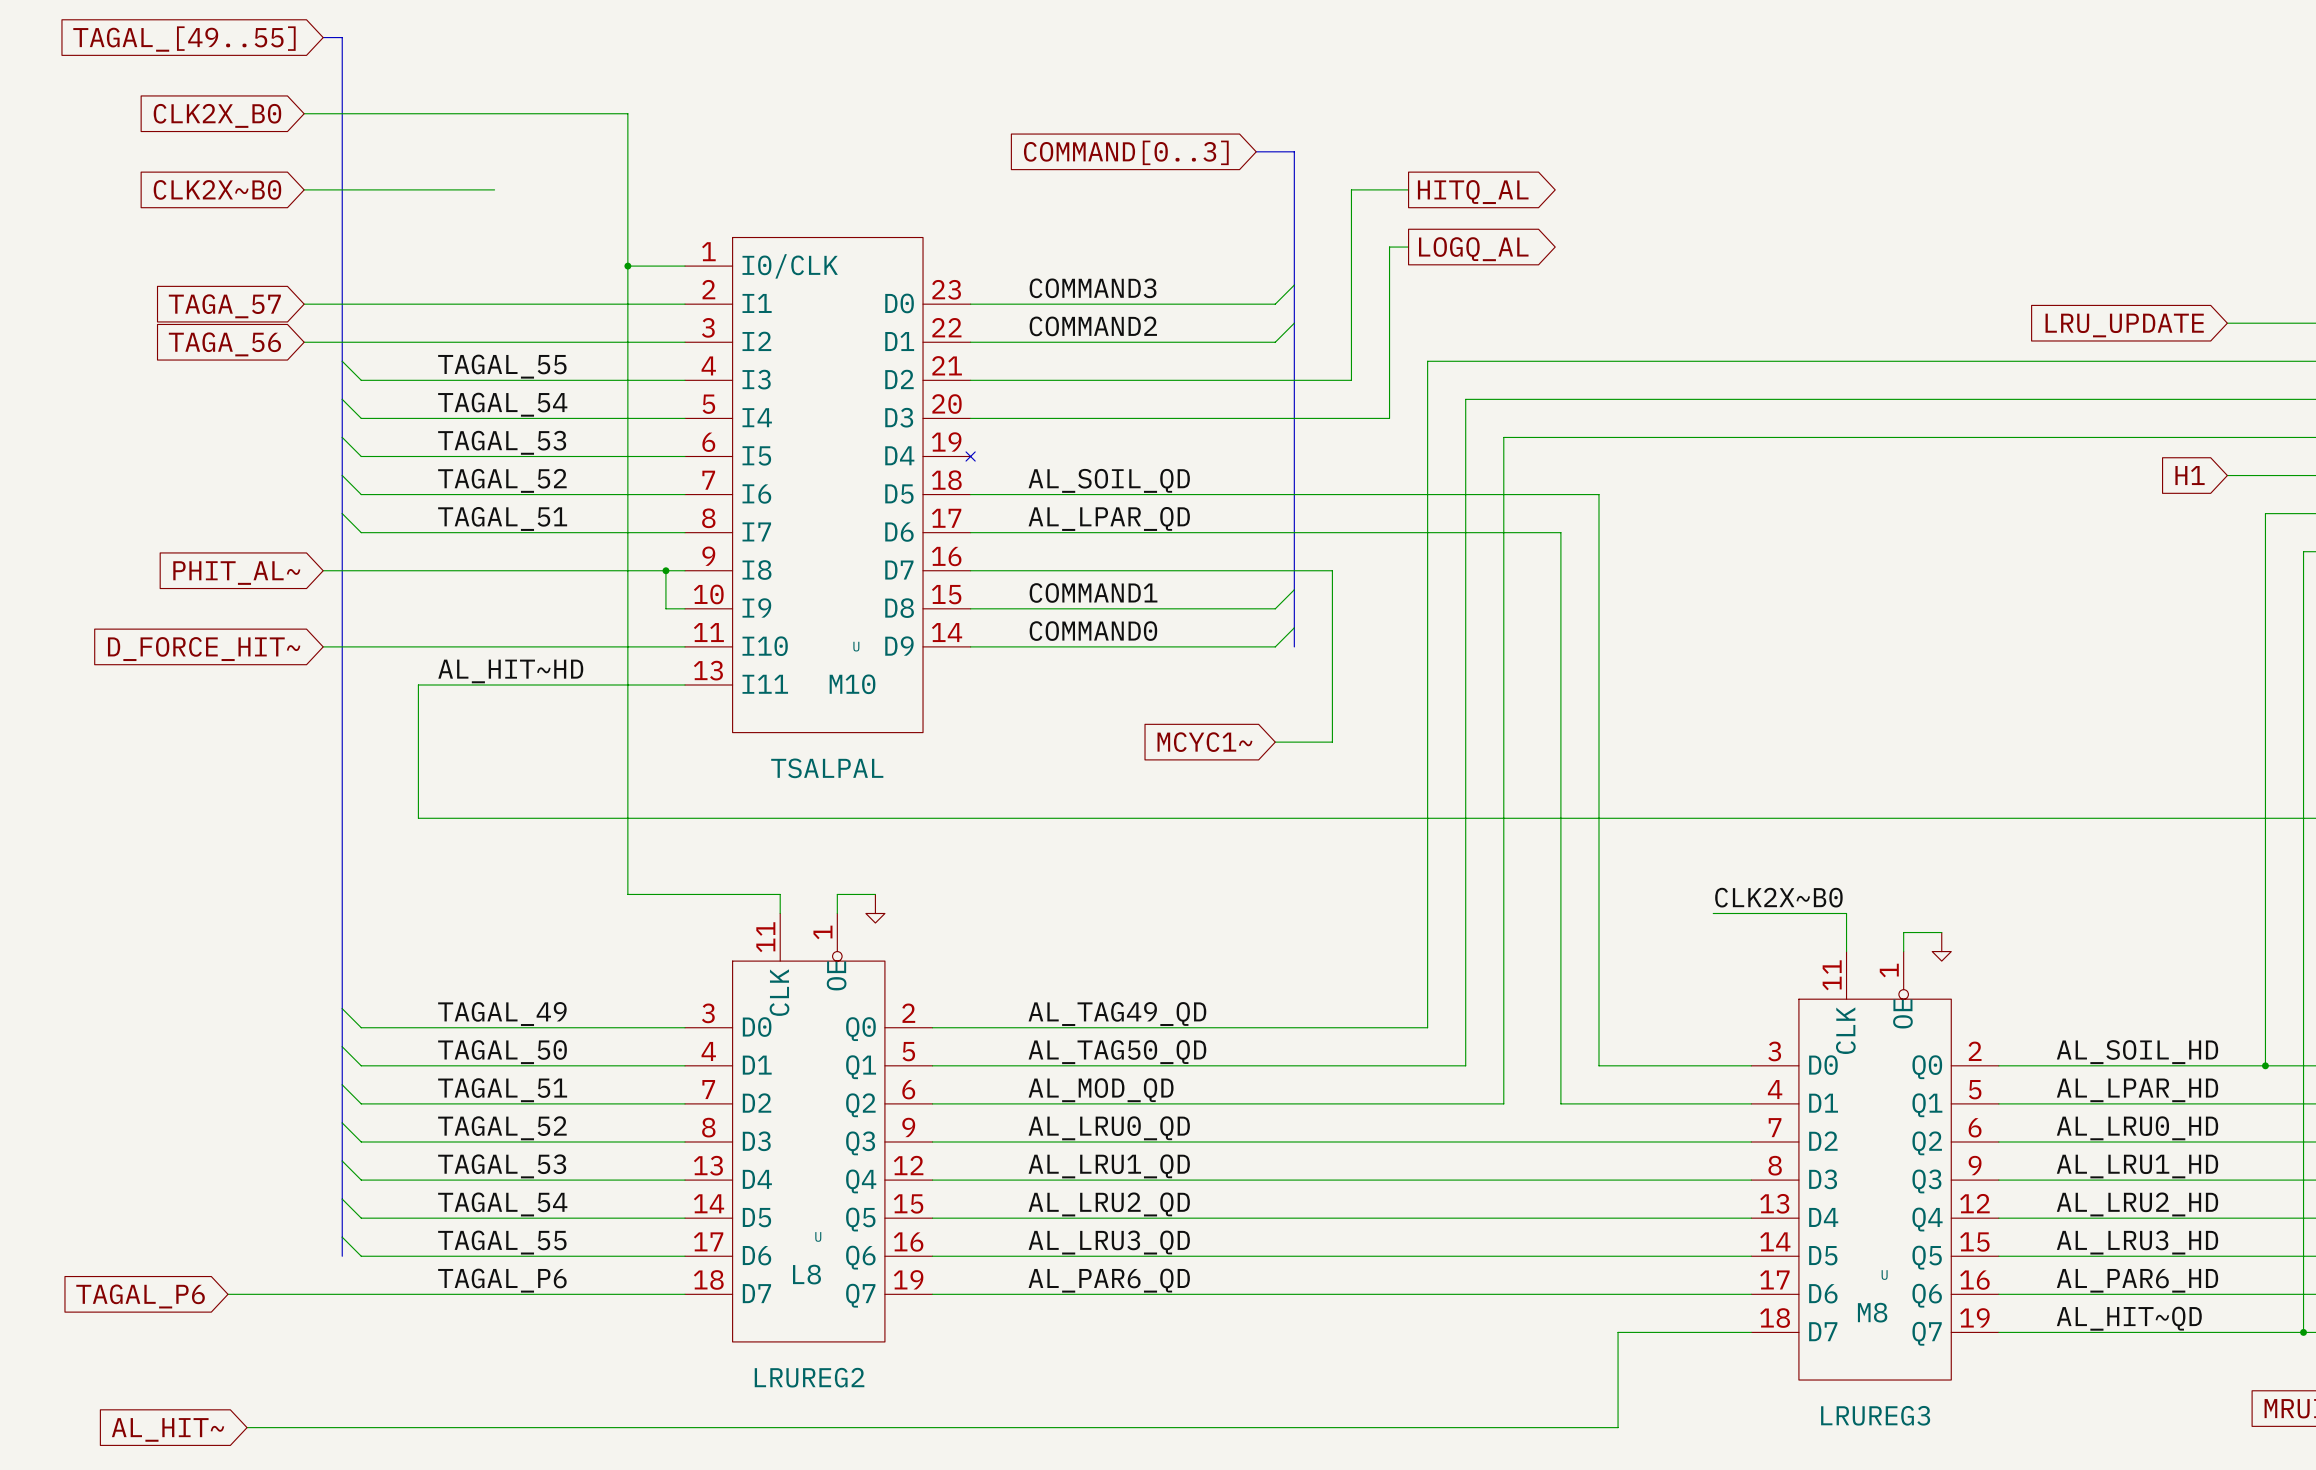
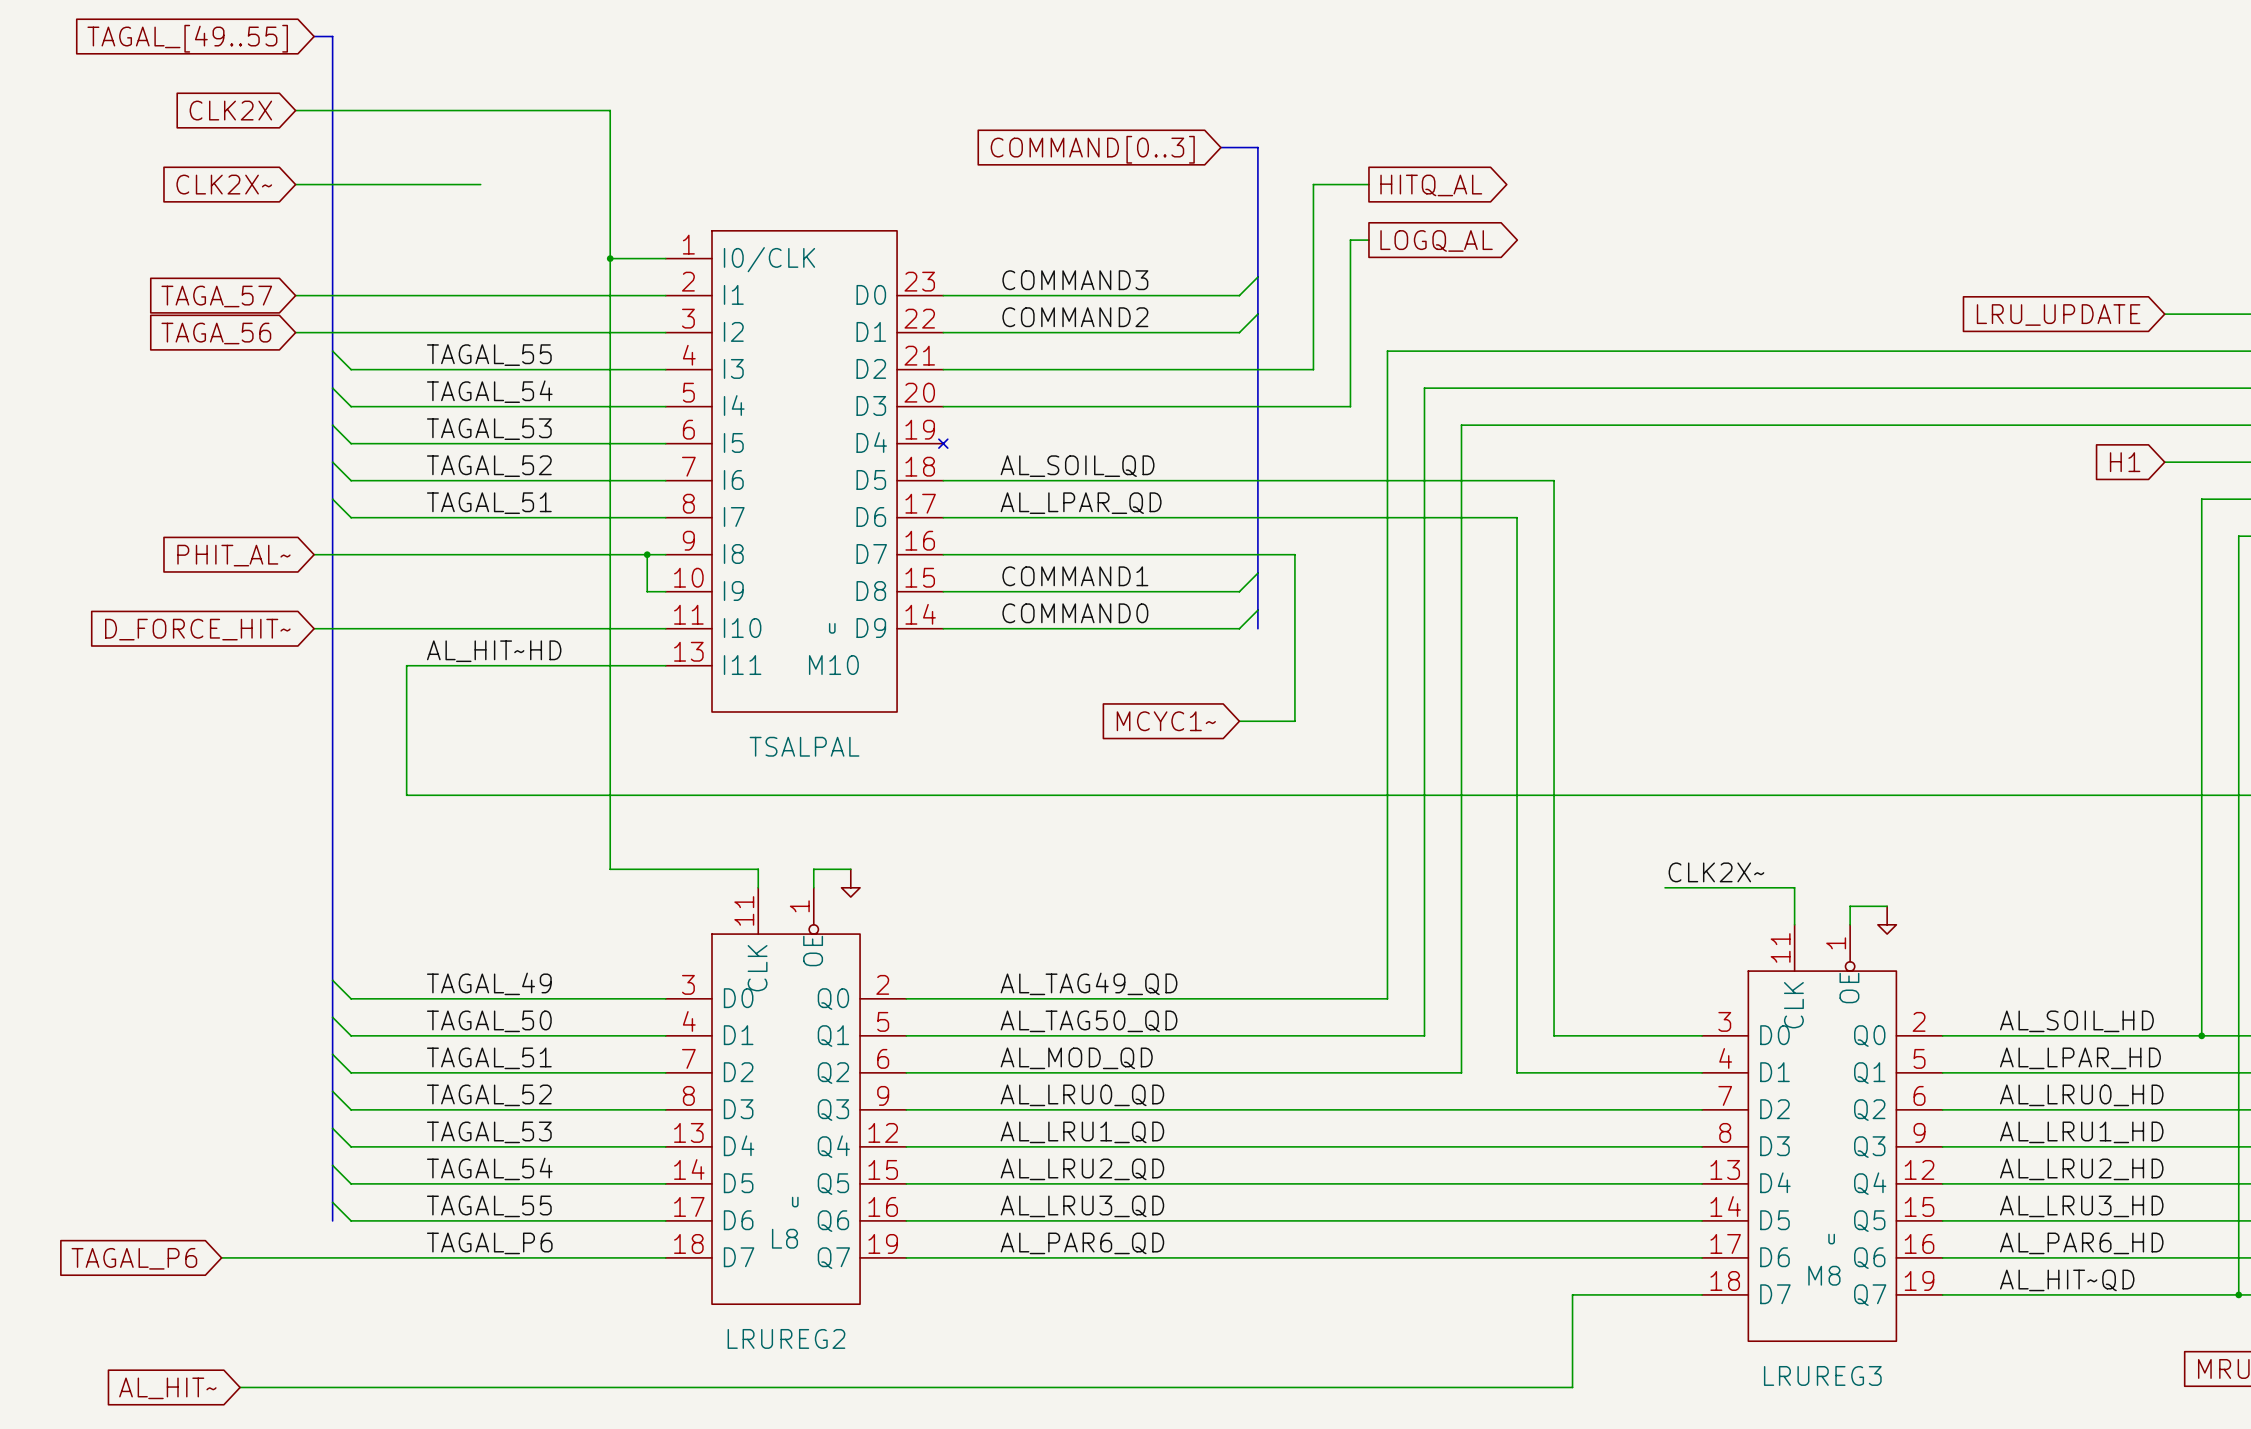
global label: CLK2X_B0 (217, 115) -> CLK2X (230, 110)
global label: CLK2X~B0 (217, 189) -> CLK2X~ (224, 184)
label: CLK2X~B0 (1778, 897) -> CLK2X~ (1716, 872)

